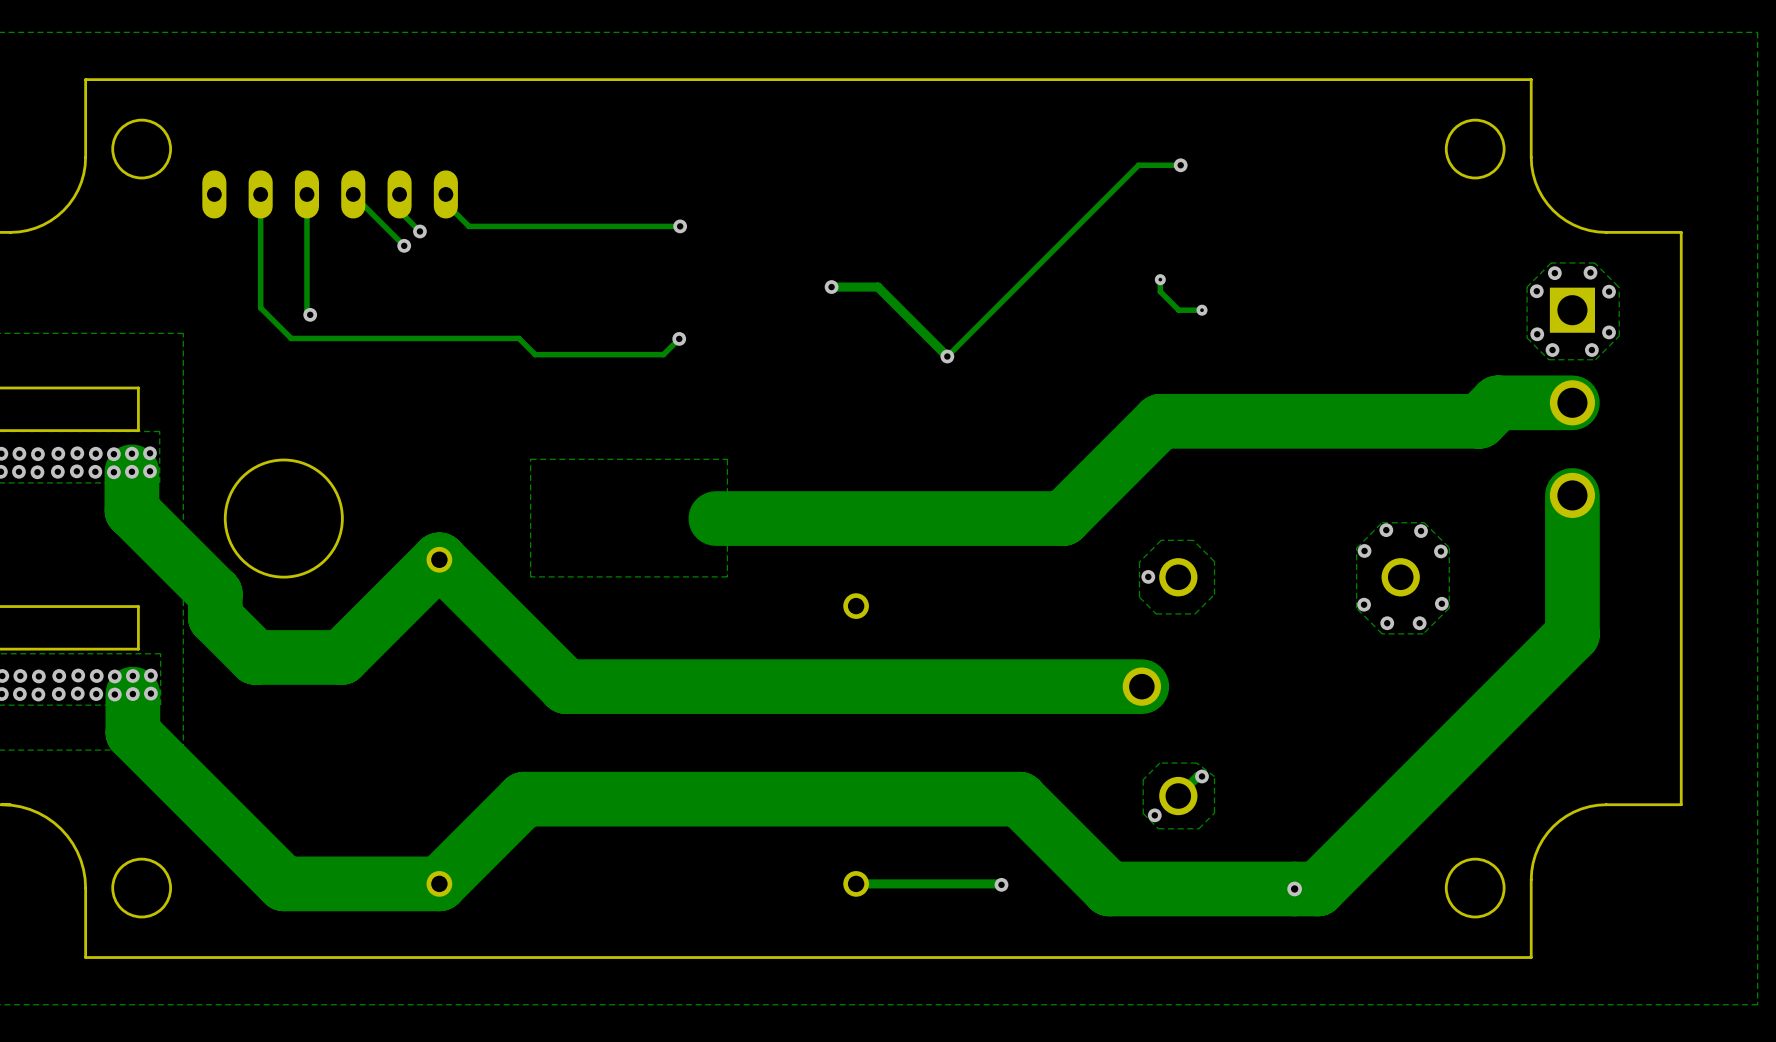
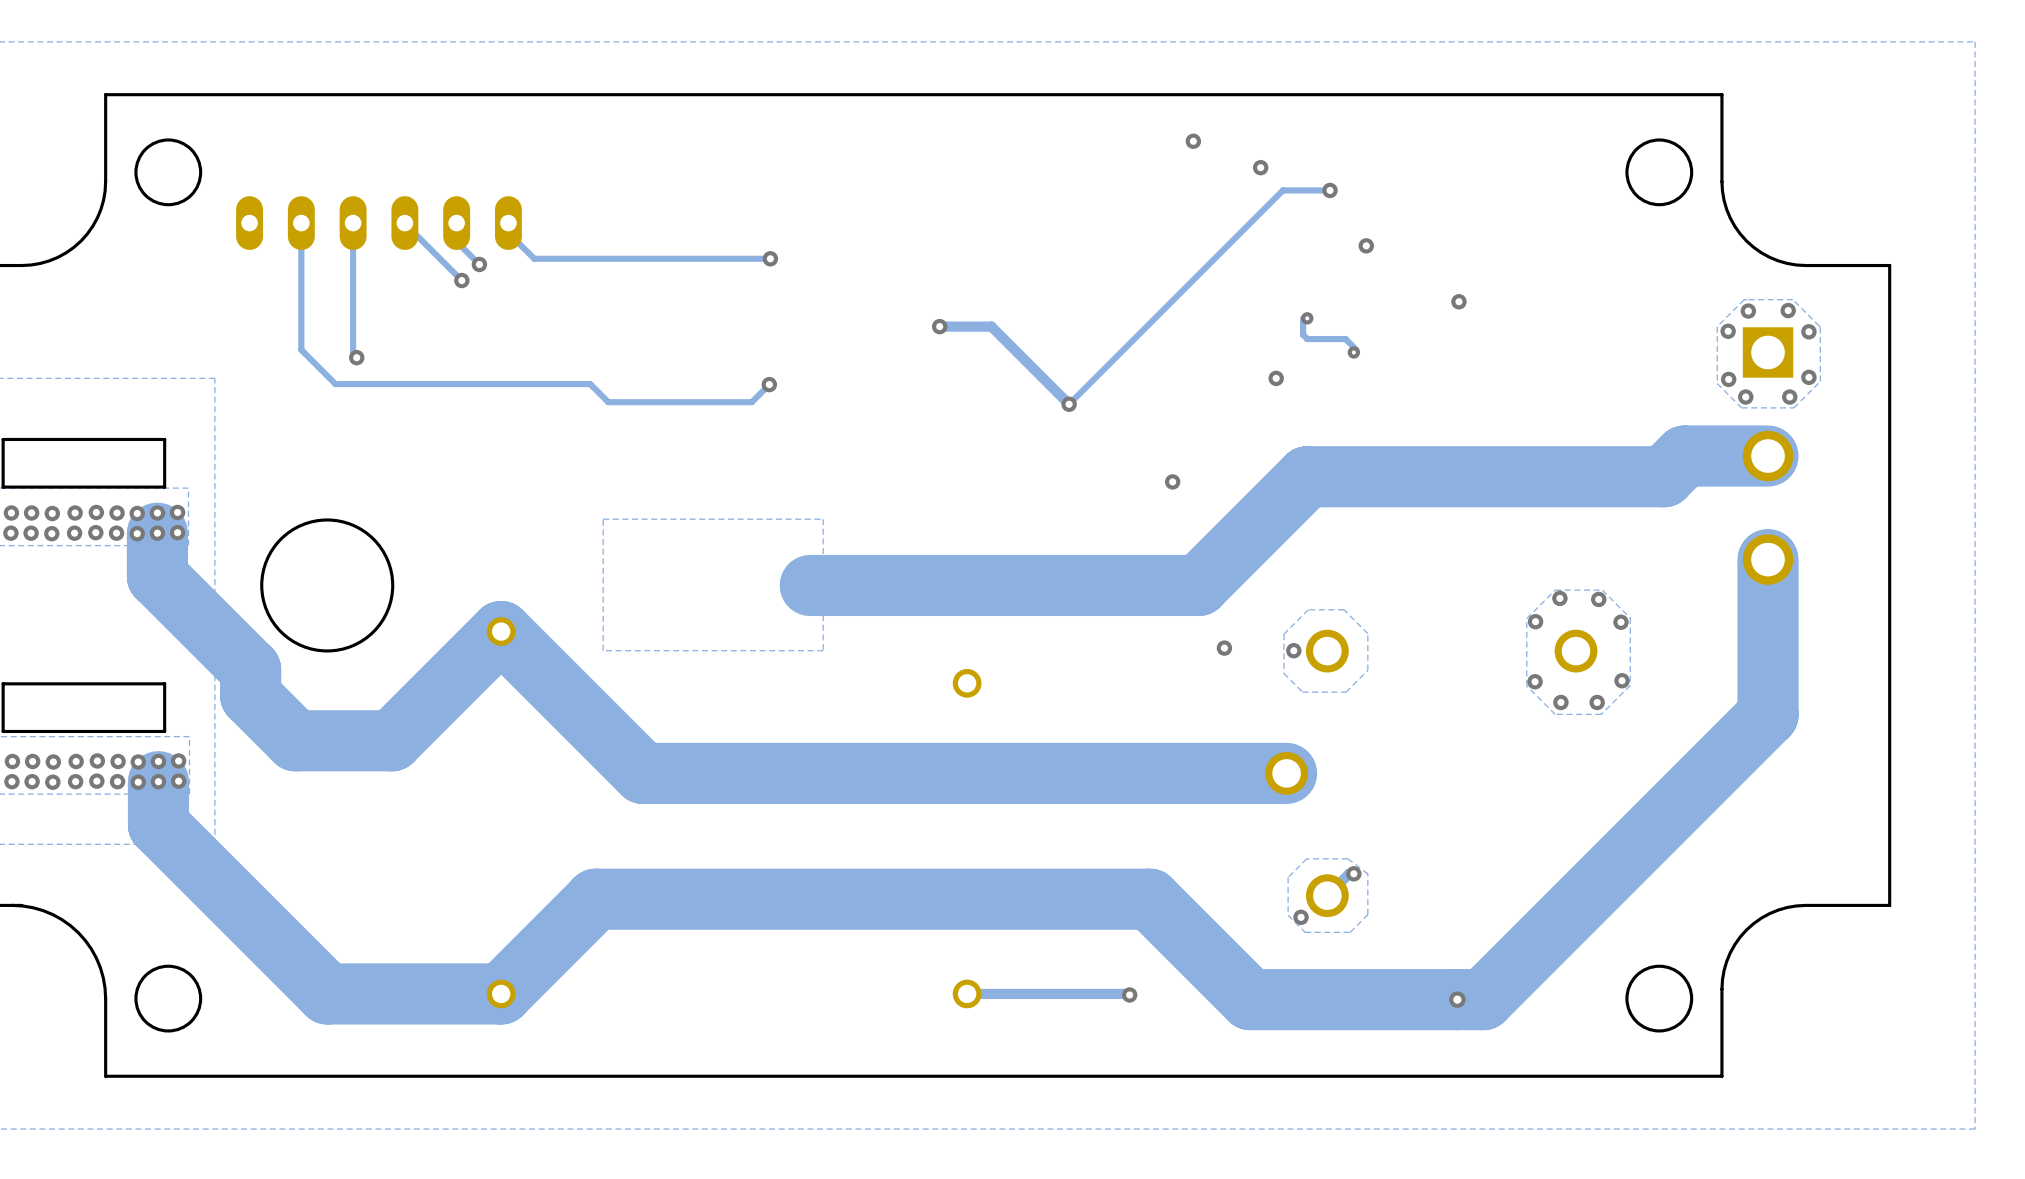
via: none -> (1193, 141)
via: none -> (1260, 167)
via: none -> (1366, 245)
via: none -> (1458, 301)
track: none -> (1303, 318) (1303, 334) (1307, 339) (1345, 339) (1356, 349)
track: (1160, 279) (1160, 291) (1178, 310) (1202, 310) -> none
via: none -> (1276, 378)
via: none -> (1172, 481)
via: none -> (1224, 648)

